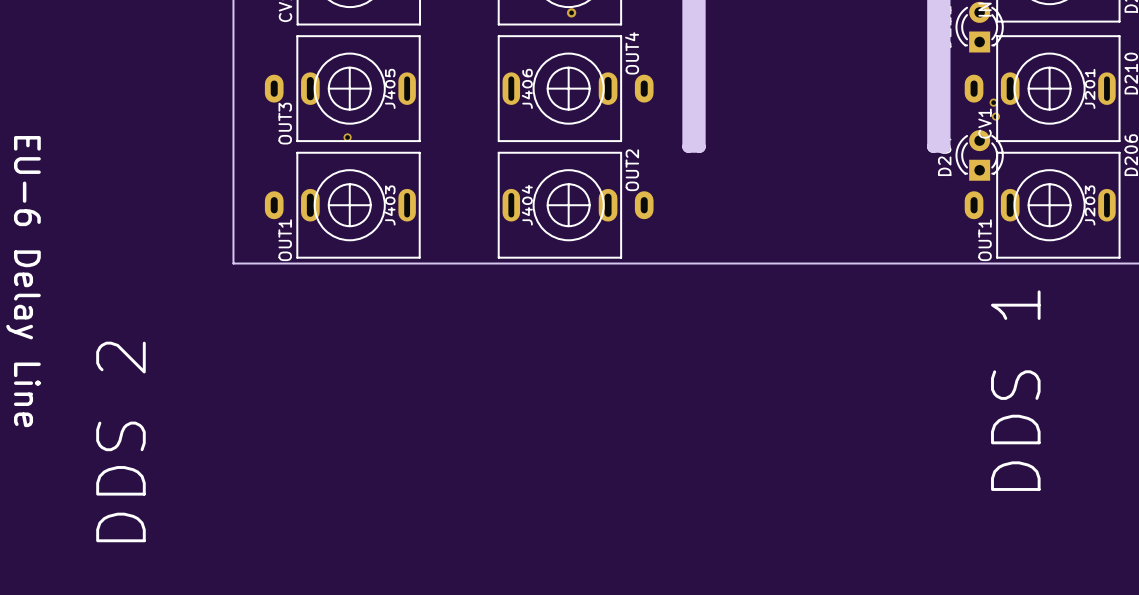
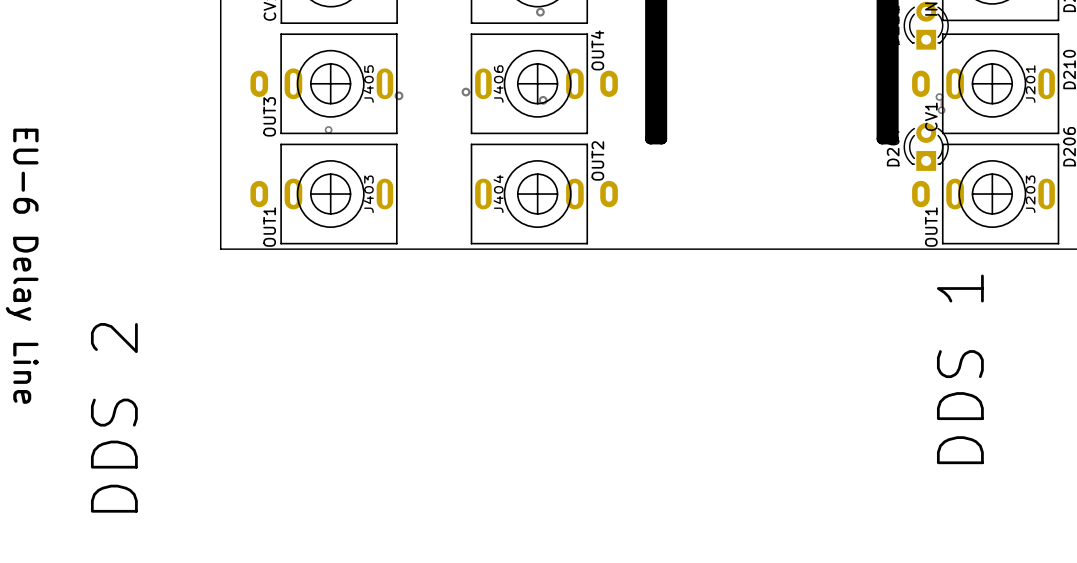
via: none -> (466, 92)
via: none -> (398, 95)
via: none -> (543, 100)

